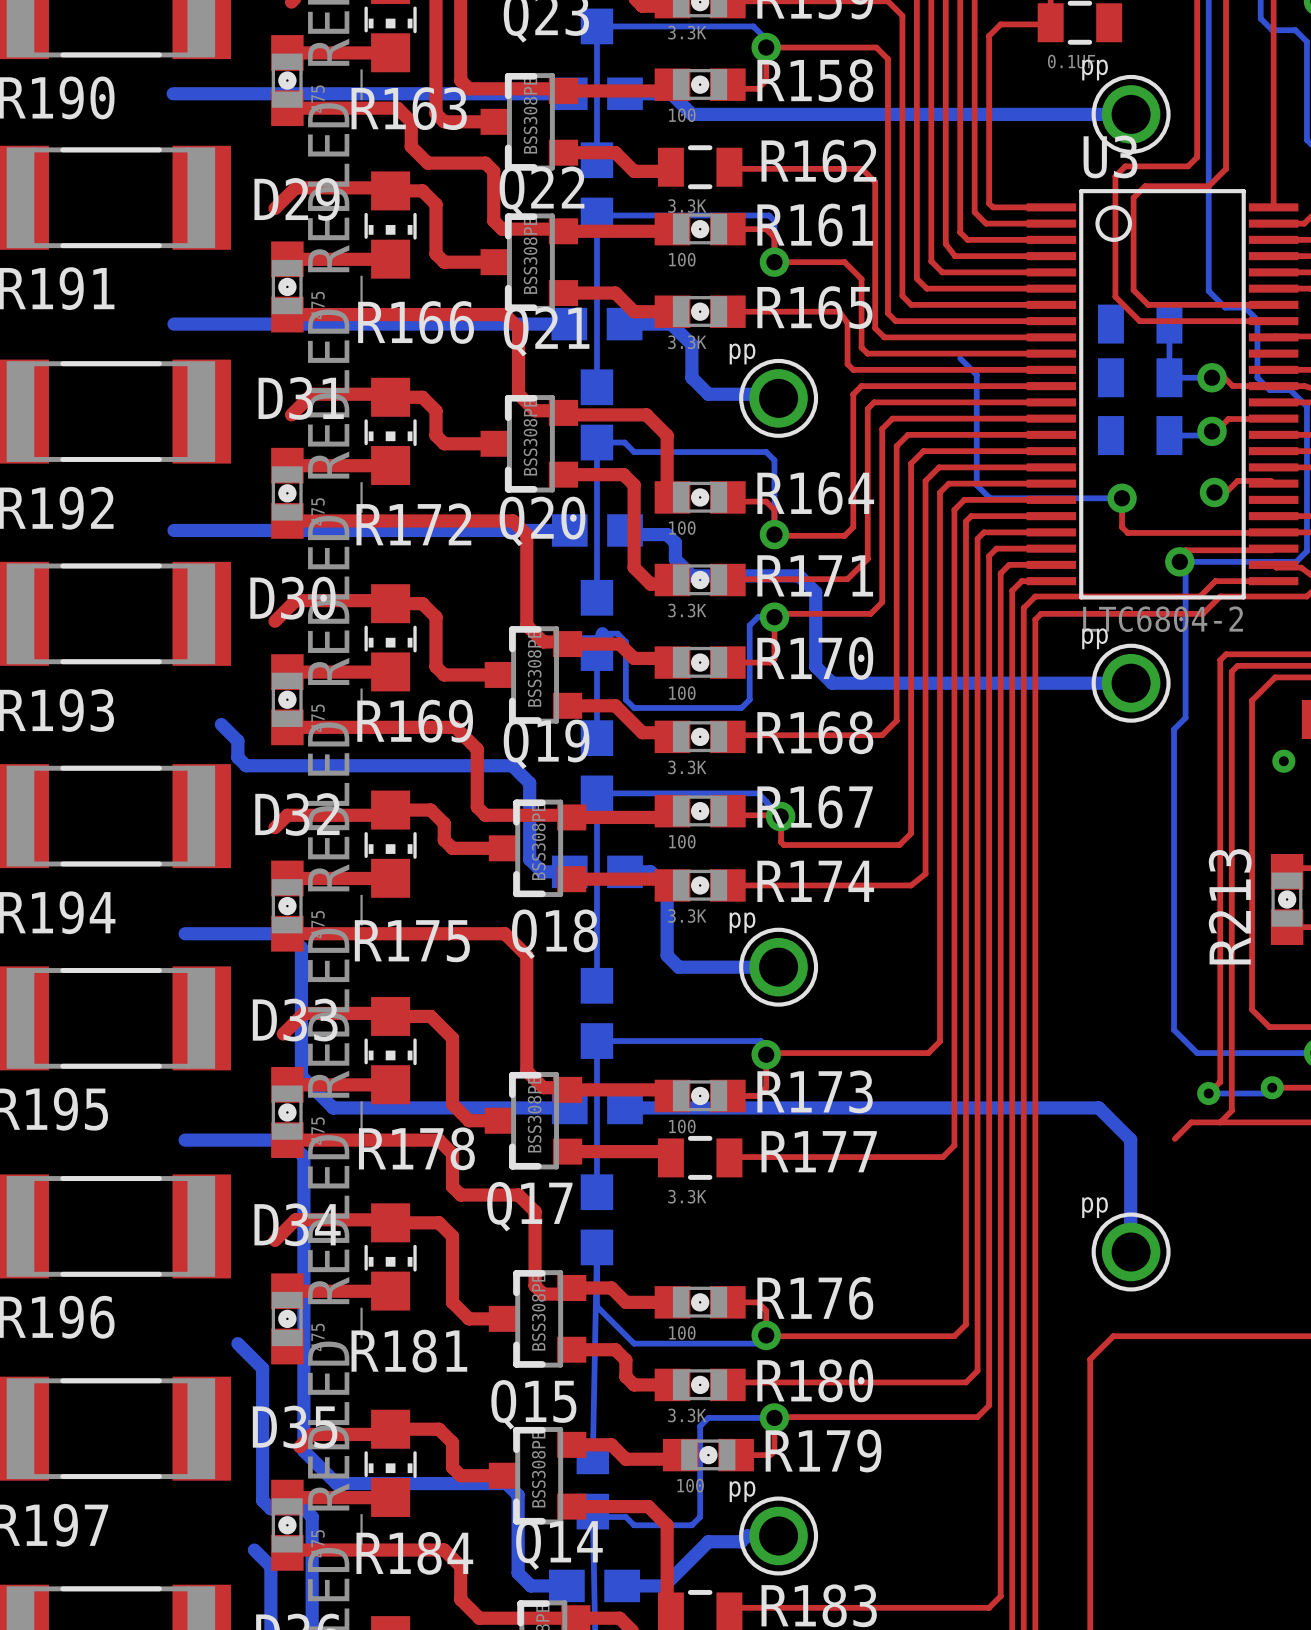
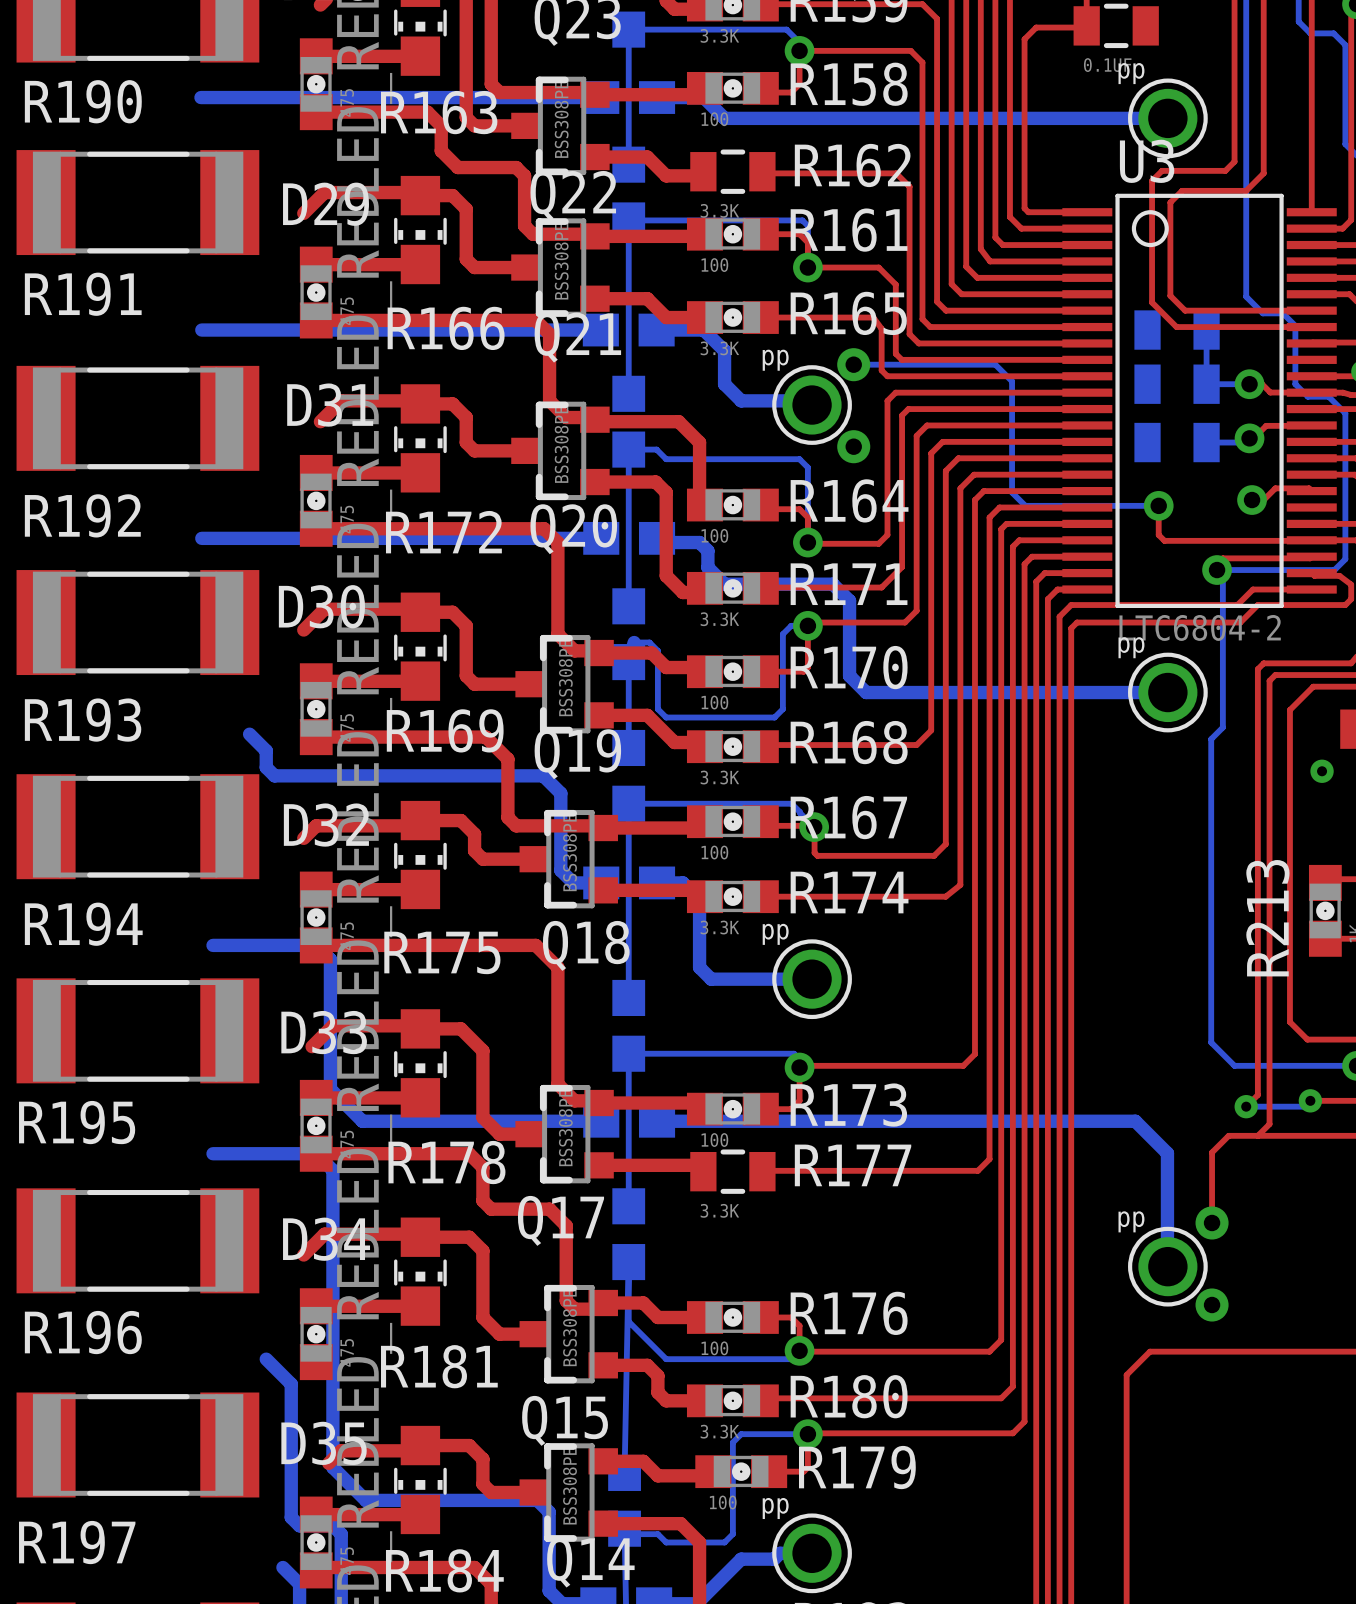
bottom track: none -> (853, 364) (995, 364)
part: none -> (853, 405)
top track: none -> (1212, 1152) (1212, 1222)
part: none -> (1212, 1263)

